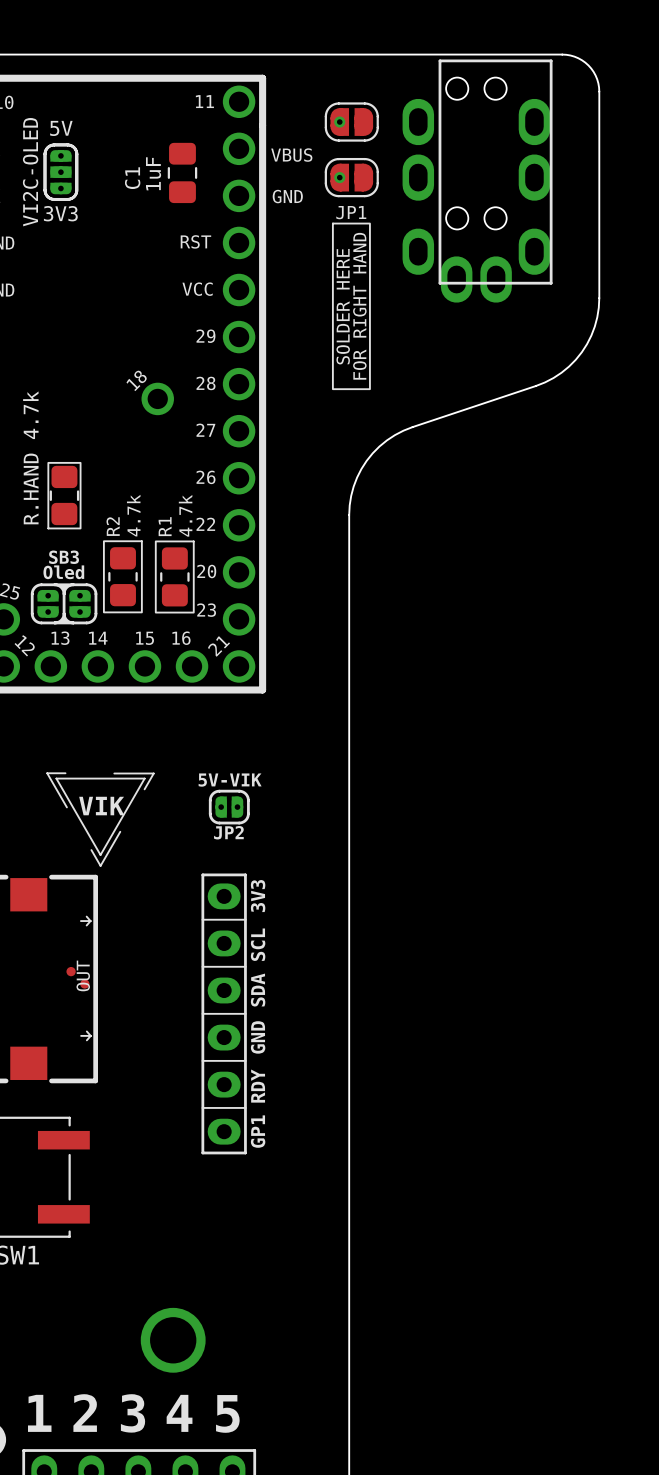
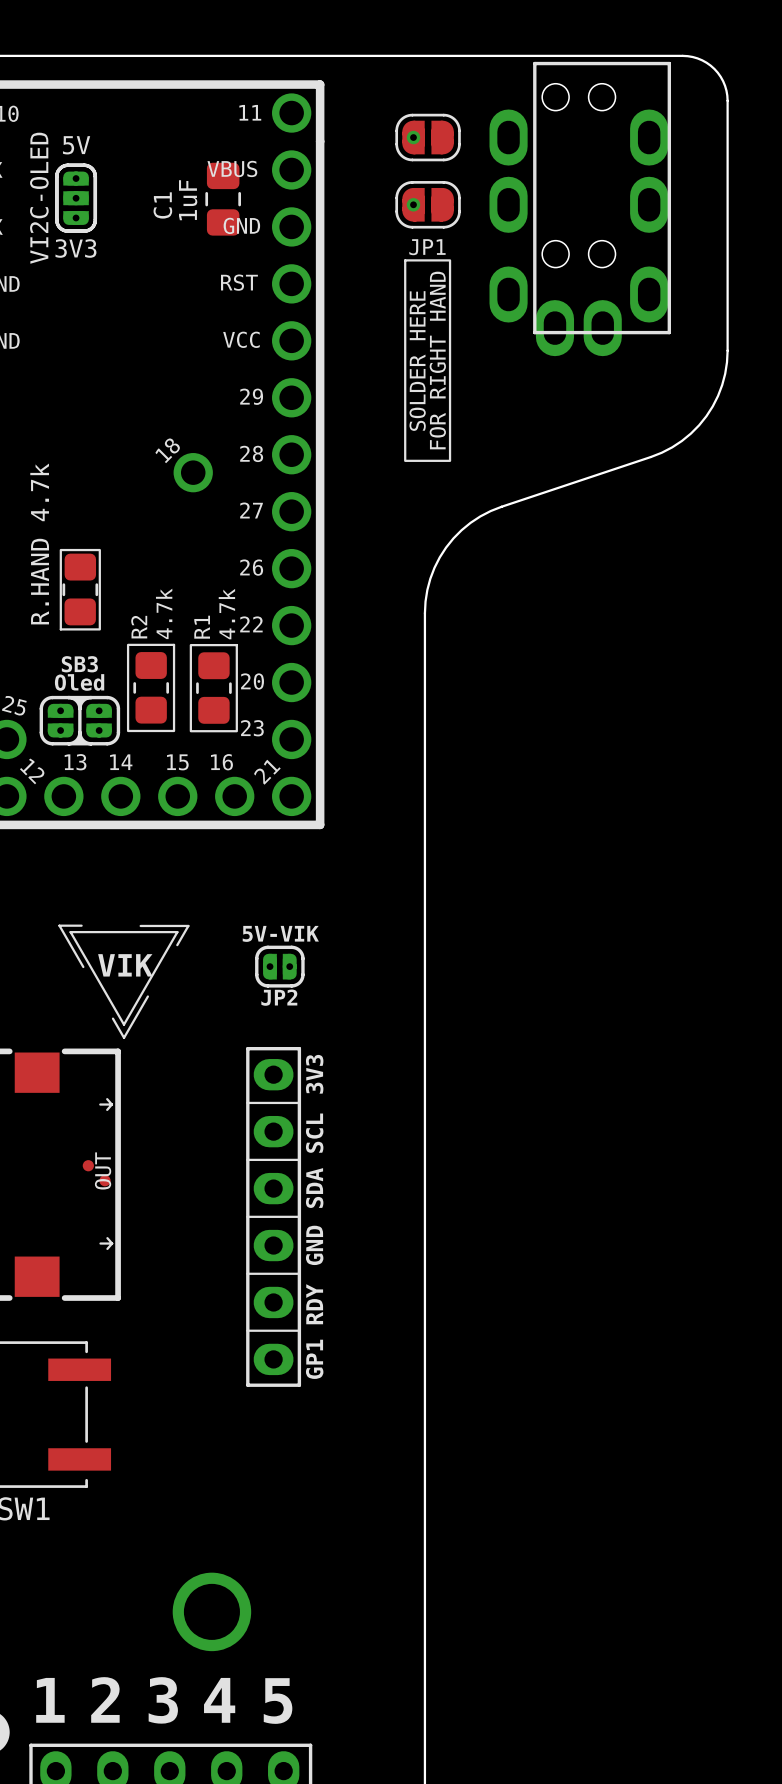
part text position: VBUS (291, 155) -> VBUS (232, 168)
part text position: GND (287, 196) -> GND (241, 225)

